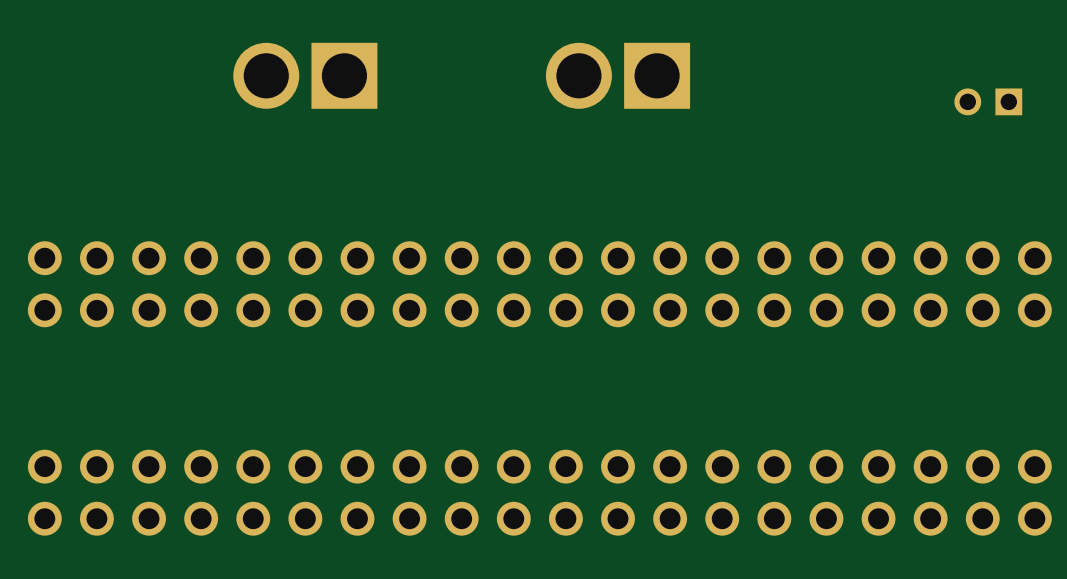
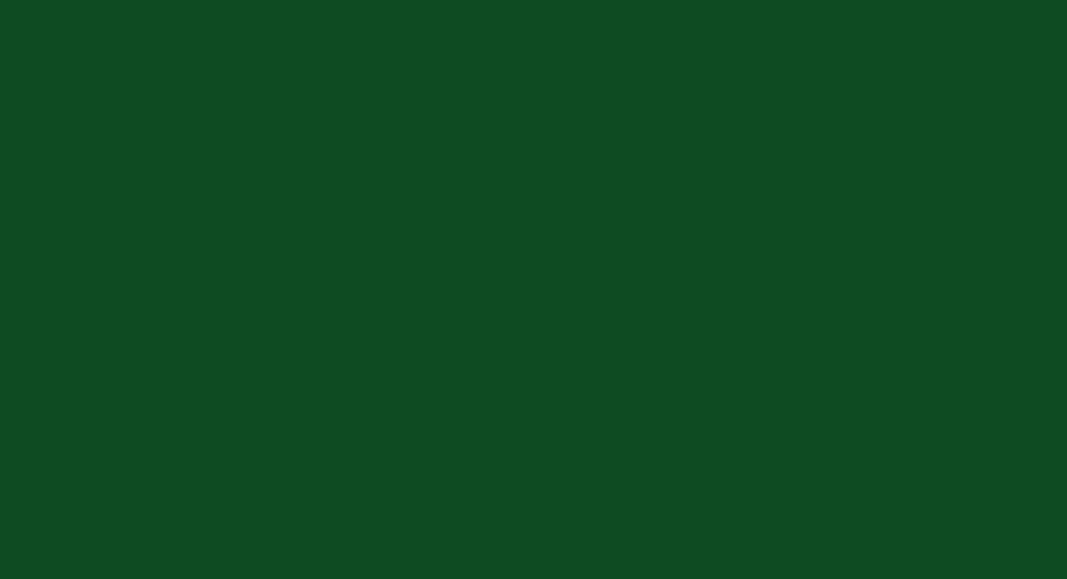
part: (305, 75) -> none
part: (618, 75) -> none
part: (988, 101) -> none
part: (539, 284) -> none
part: (539, 492) -> none

